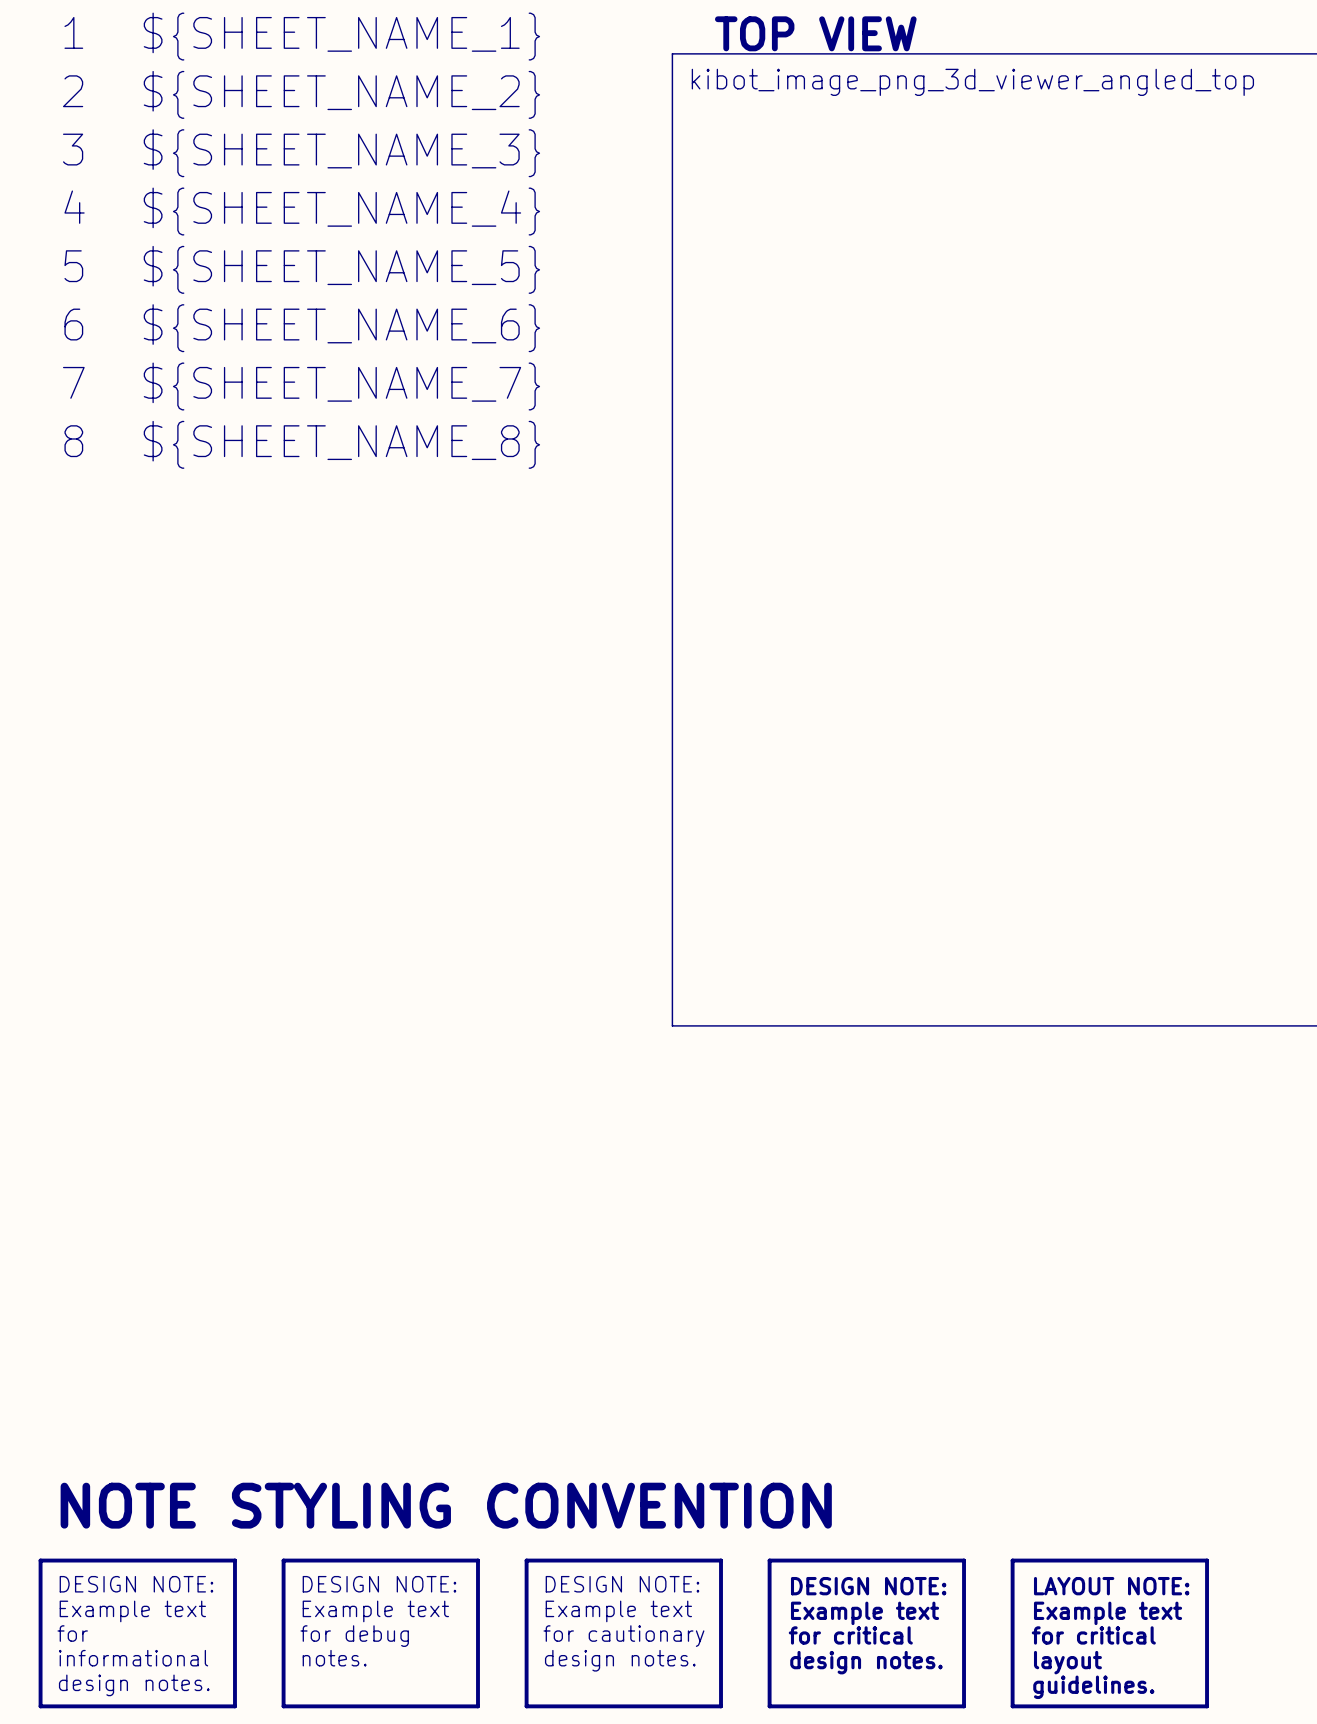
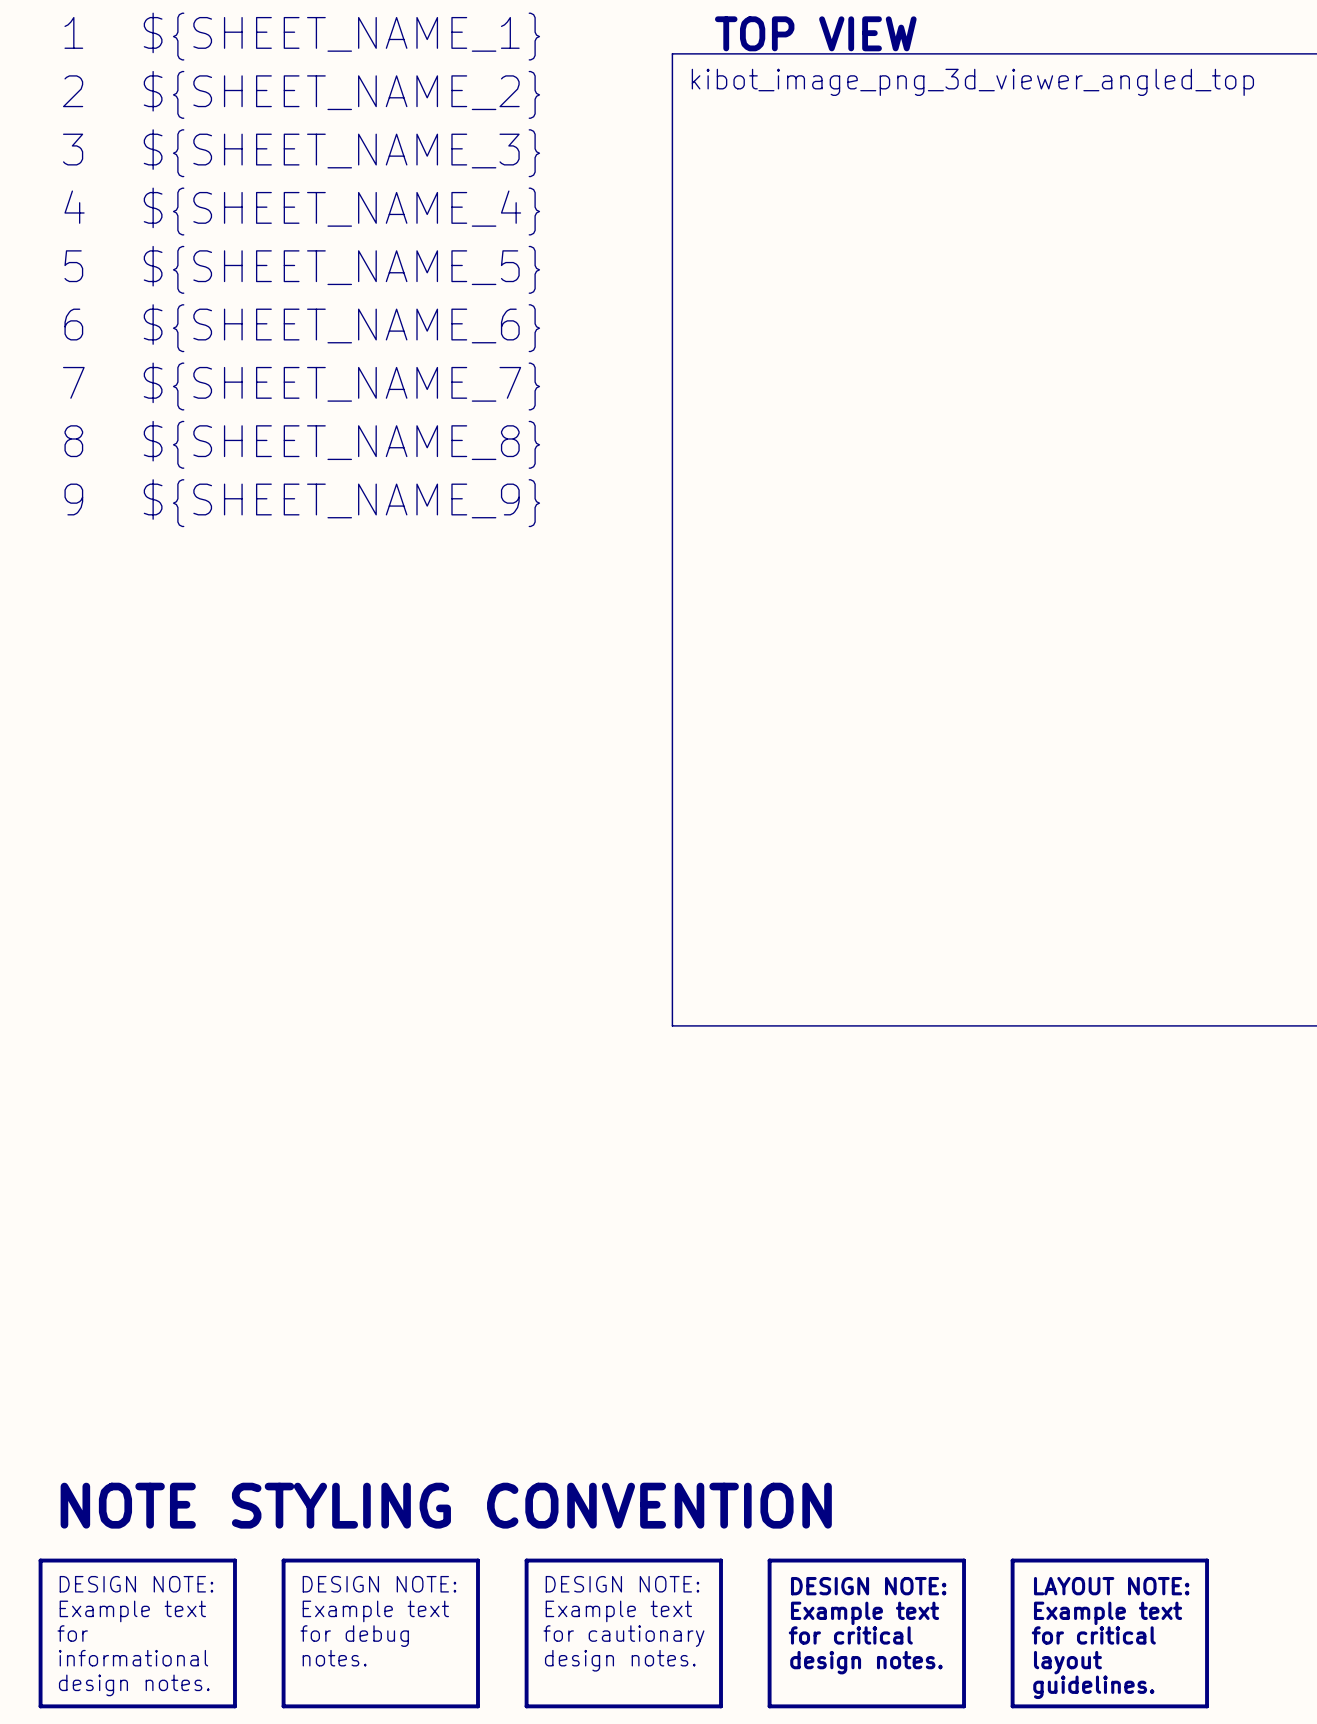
text: none -> 9 (73, 499)
text: none -> ${SHEET_NAME_9} (341, 503)

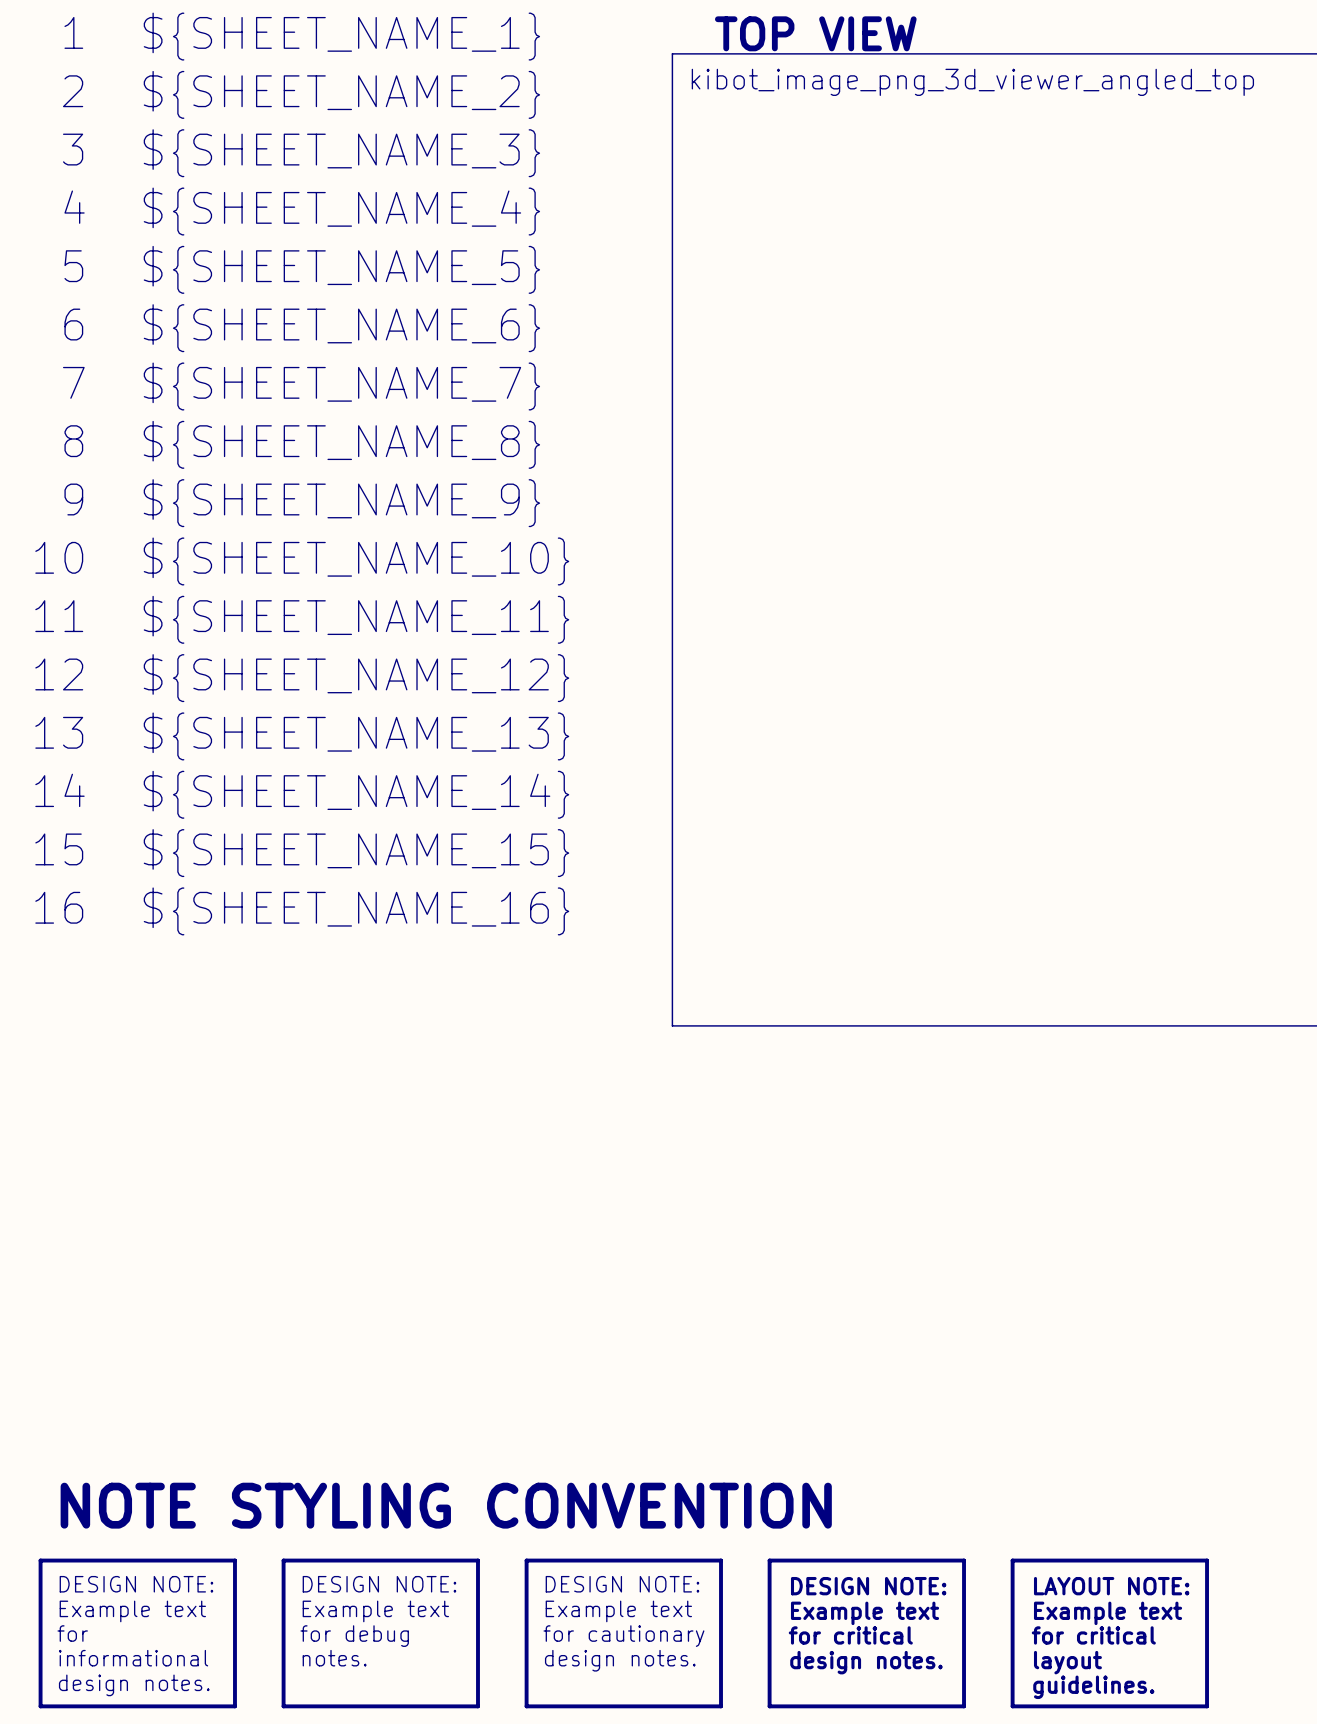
text: none -> 10 (59, 557)
text: none -> ${SHEET_NAME_10} (356, 561)
text: none -> 11 (59, 616)
text: none -> ${SHEET_NAME_11} (356, 619)
text: none -> 12 (59, 674)
text: none -> ${SHEET_NAME_12} (356, 678)
text: none -> 13 (59, 732)
text: none -> ${SHEET_NAME_13} (356, 736)
text: none -> 14 (59, 790)
text: none -> ${SHEET_NAME_14} (356, 794)
text: none -> 15 (59, 849)
text: none -> ${SHEET_NAME_15} (356, 853)
text: none -> 16 (59, 907)
text: none -> ${SHEET_NAME_16} (356, 911)

